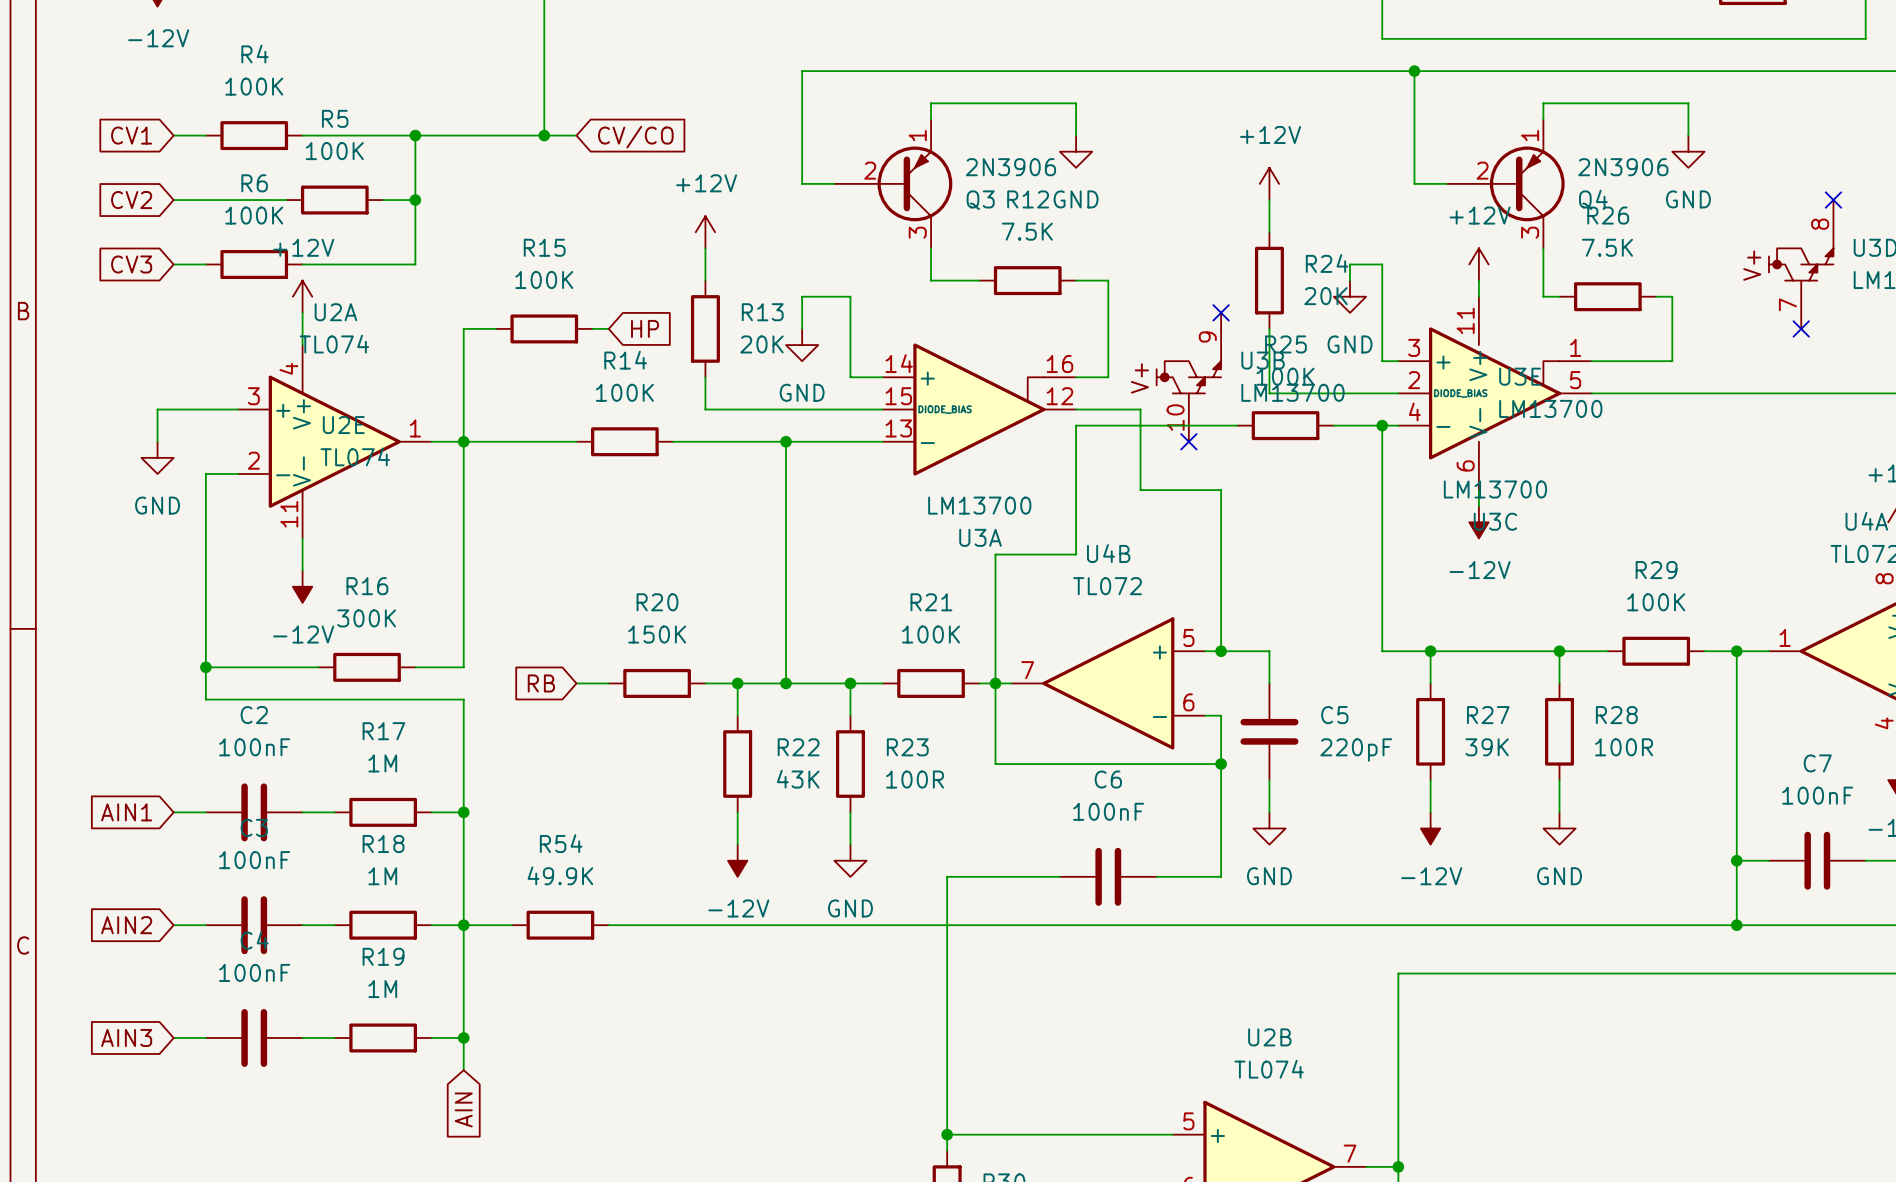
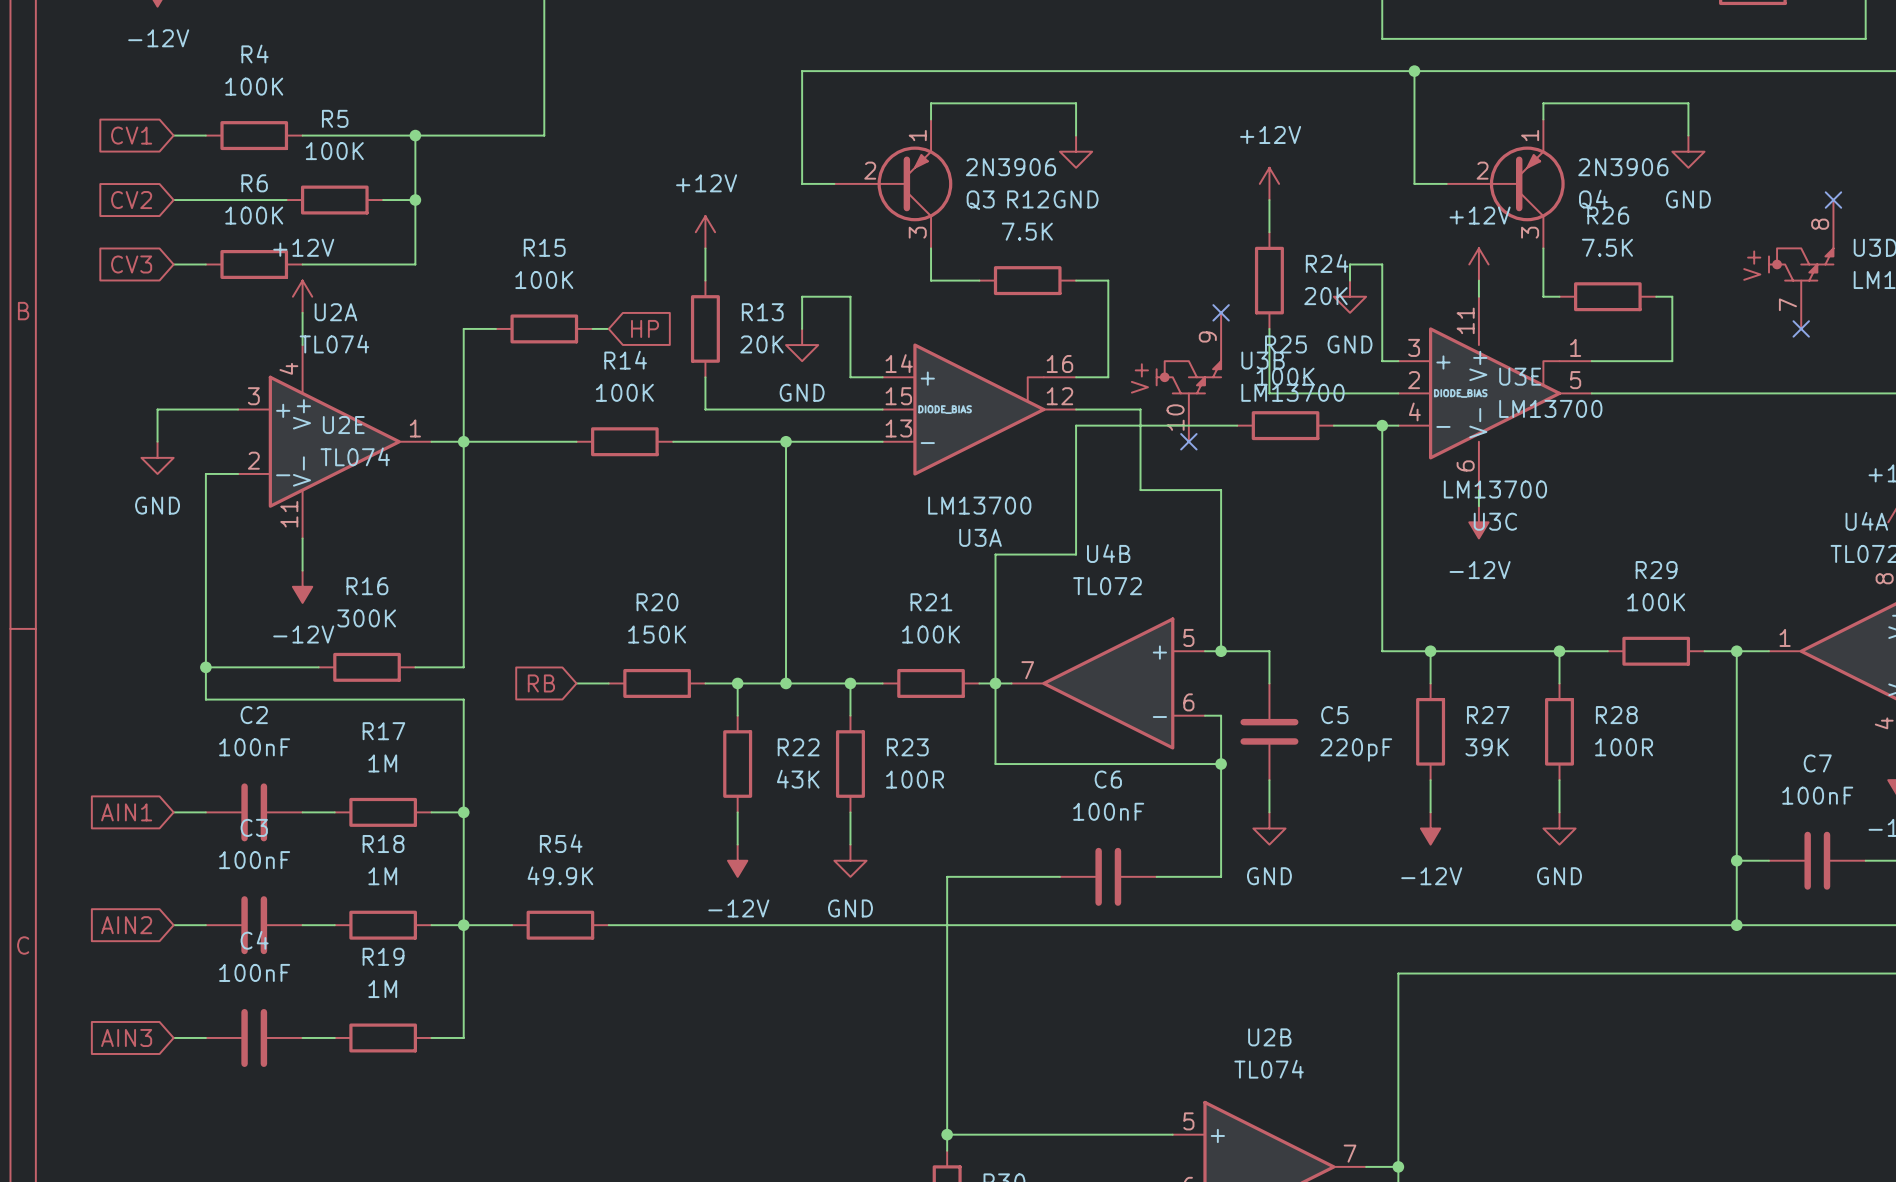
wire: (544, 135) (576, 135) -> none
junction: (544, 135) -> none
global label: CV/CO (635, 137) -> none
wire: (463, 1037) (463, 1070) -> none
junction: (463, 1037) -> none
global label: AIN (463, 1109) -> none

